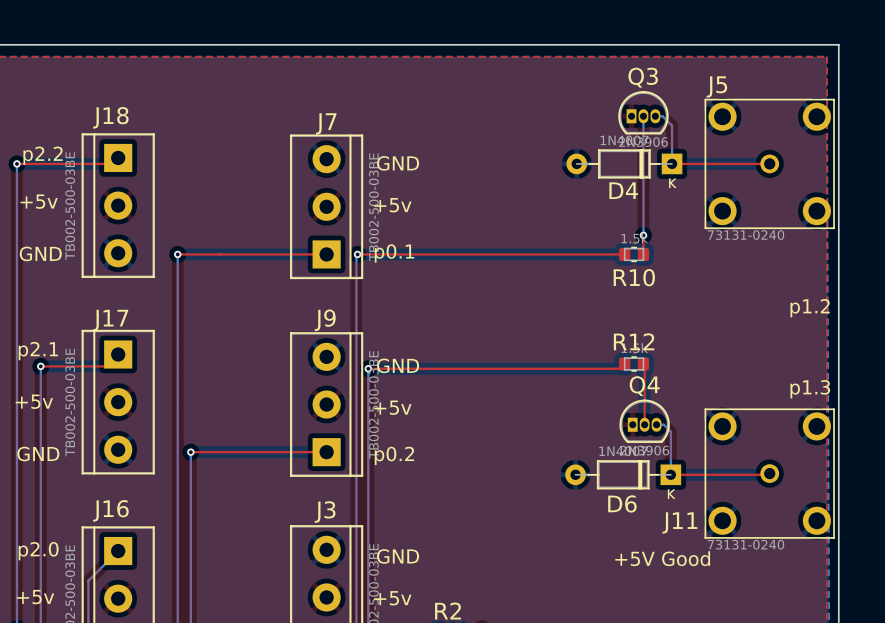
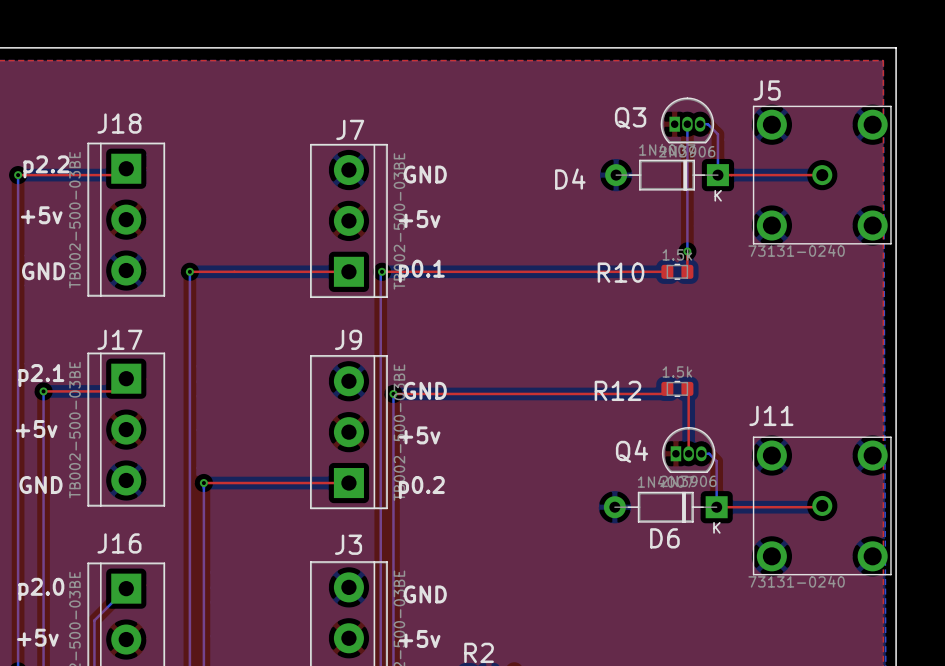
Q3 name position: Q3 (643, 77) -> Q3 (630, 118)
D4 name position: D4 (623, 190) -> D4 (570, 179)
R10 name position: R10 (634, 277) -> R10 (620, 272)
text: p1.2 (810, 308) -> none
R12 name position: R12 (634, 341) -> R12 (617, 390)
Q4 name position: Q4 (644, 386) -> Q4 (632, 451)
text: p1.3 (810, 389) -> none
J11 name position: J11 (679, 522) -> J11 (771, 415)
text: +5V Good (662, 558) -> none

